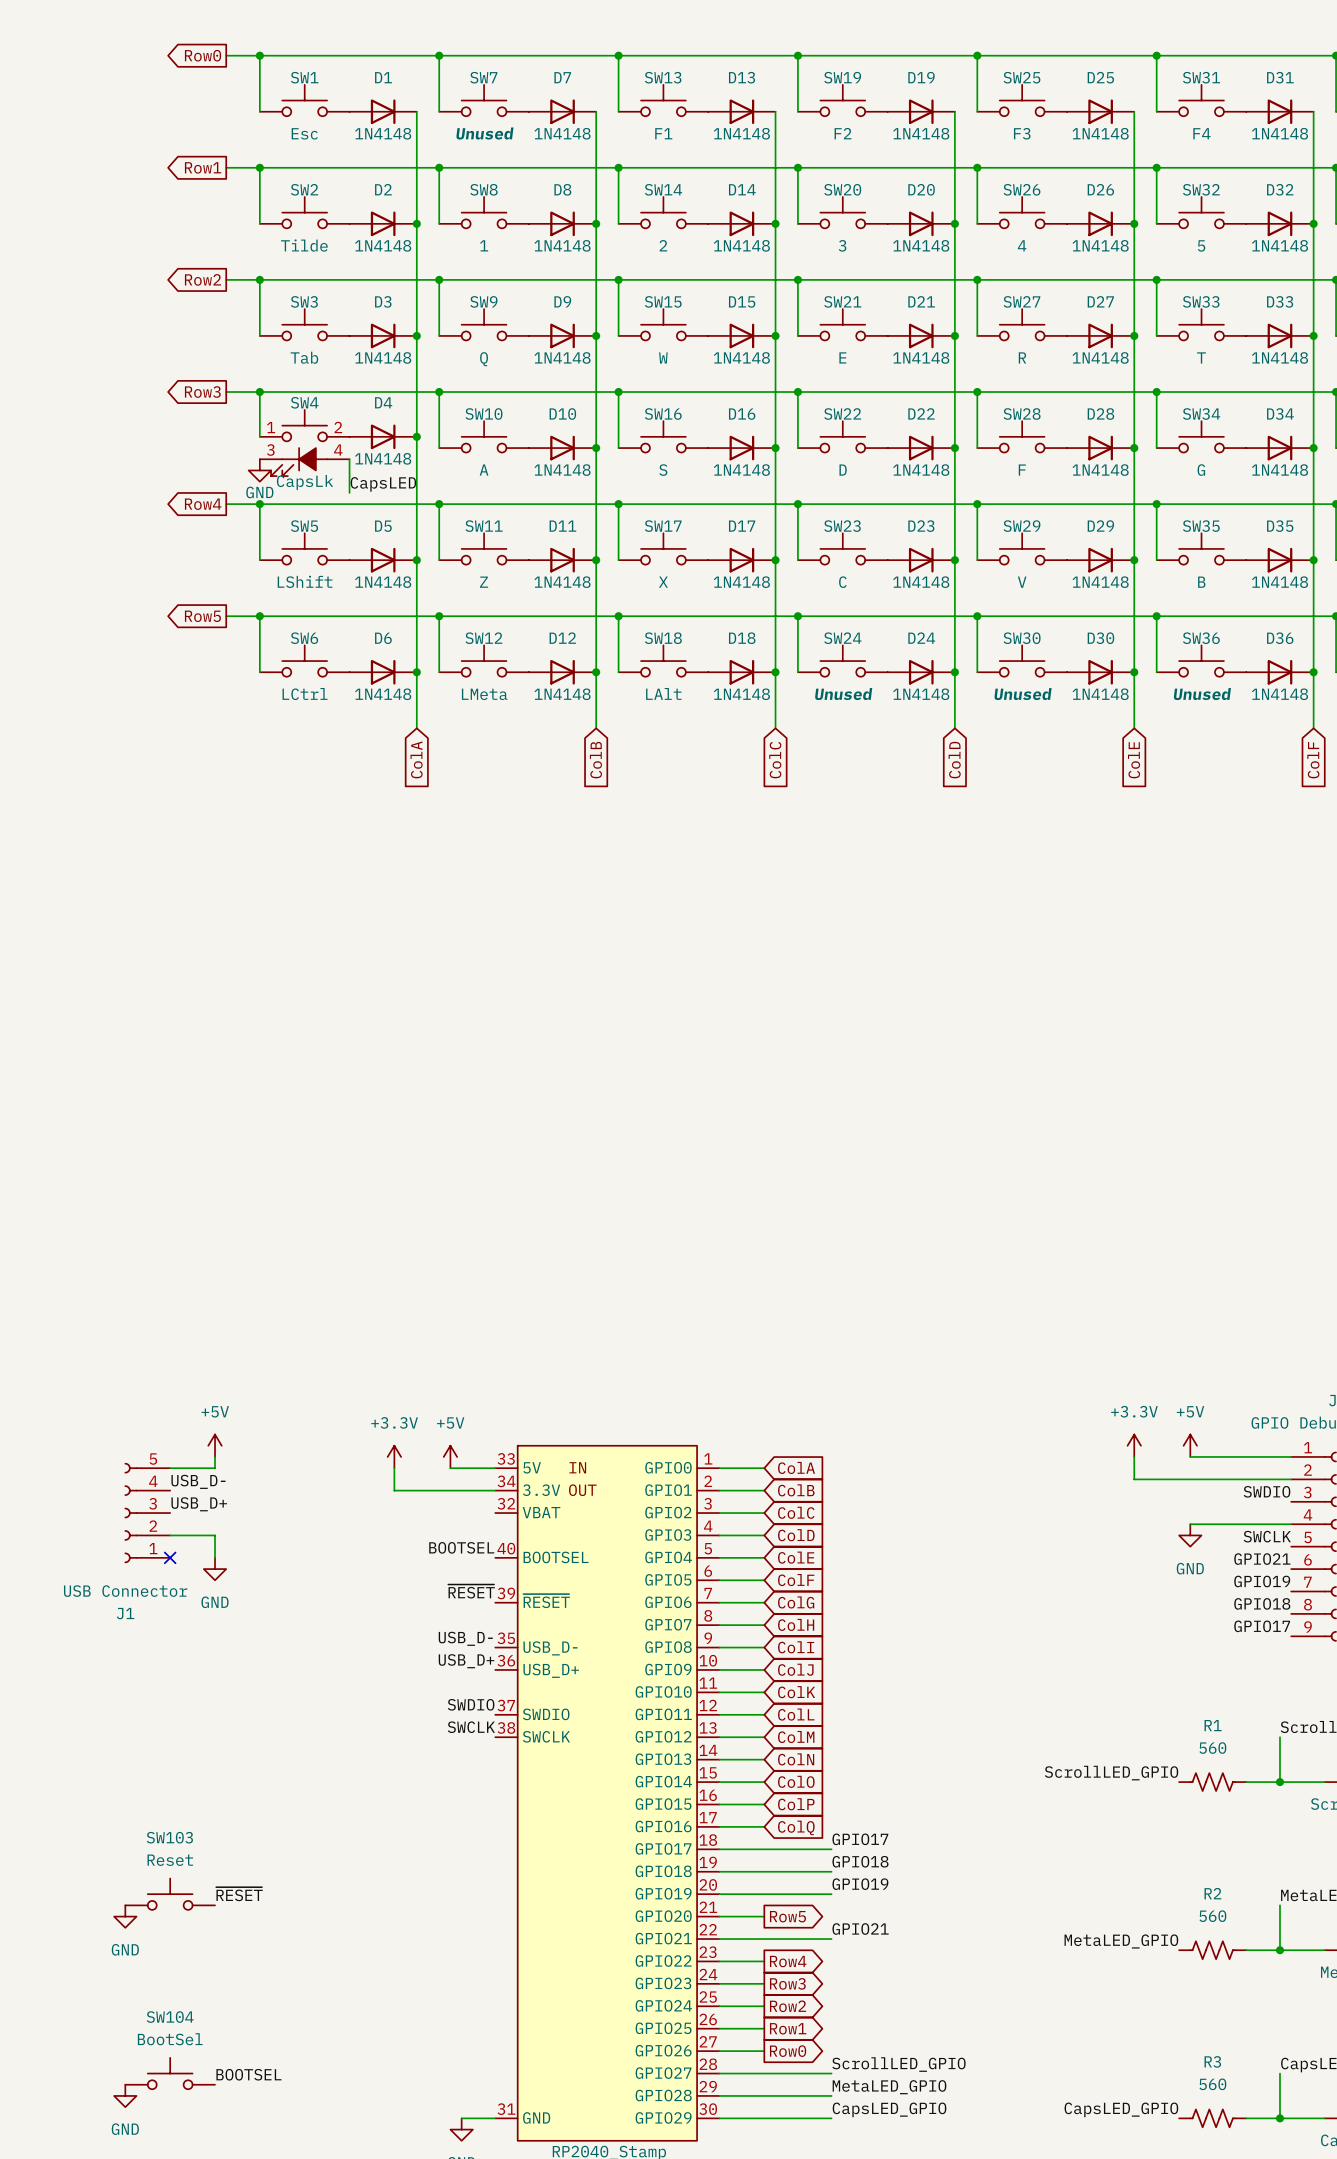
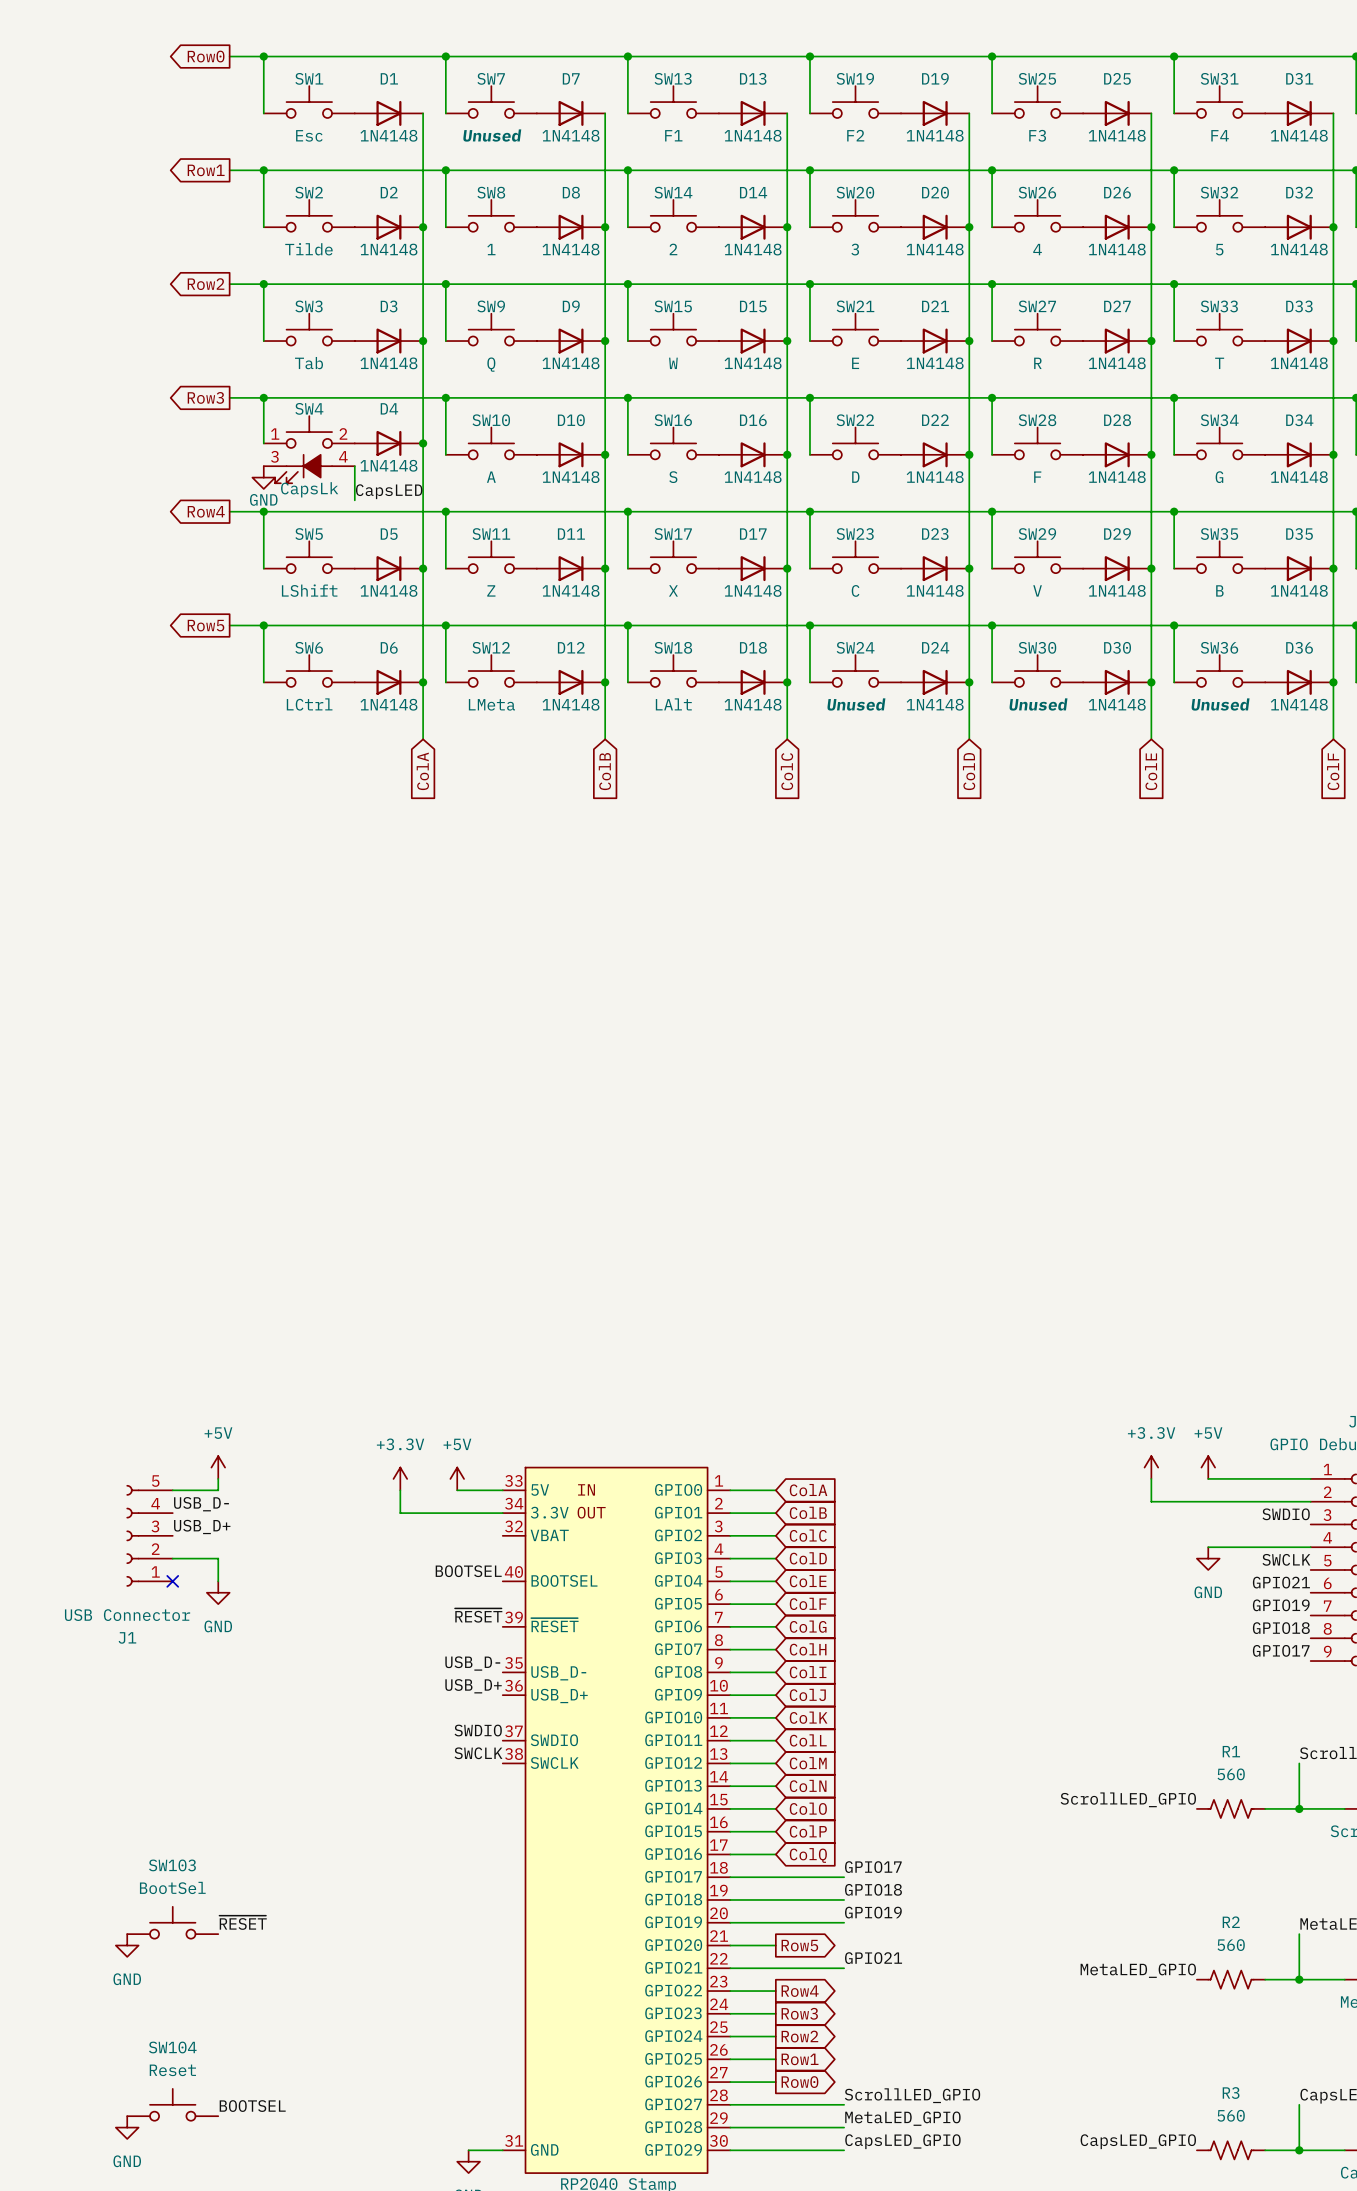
SW103 value: Reset (170, 1860) -> BootSel (172, 1887)
SW104 value: BootSel (170, 2039) -> Reset (172, 2070)

